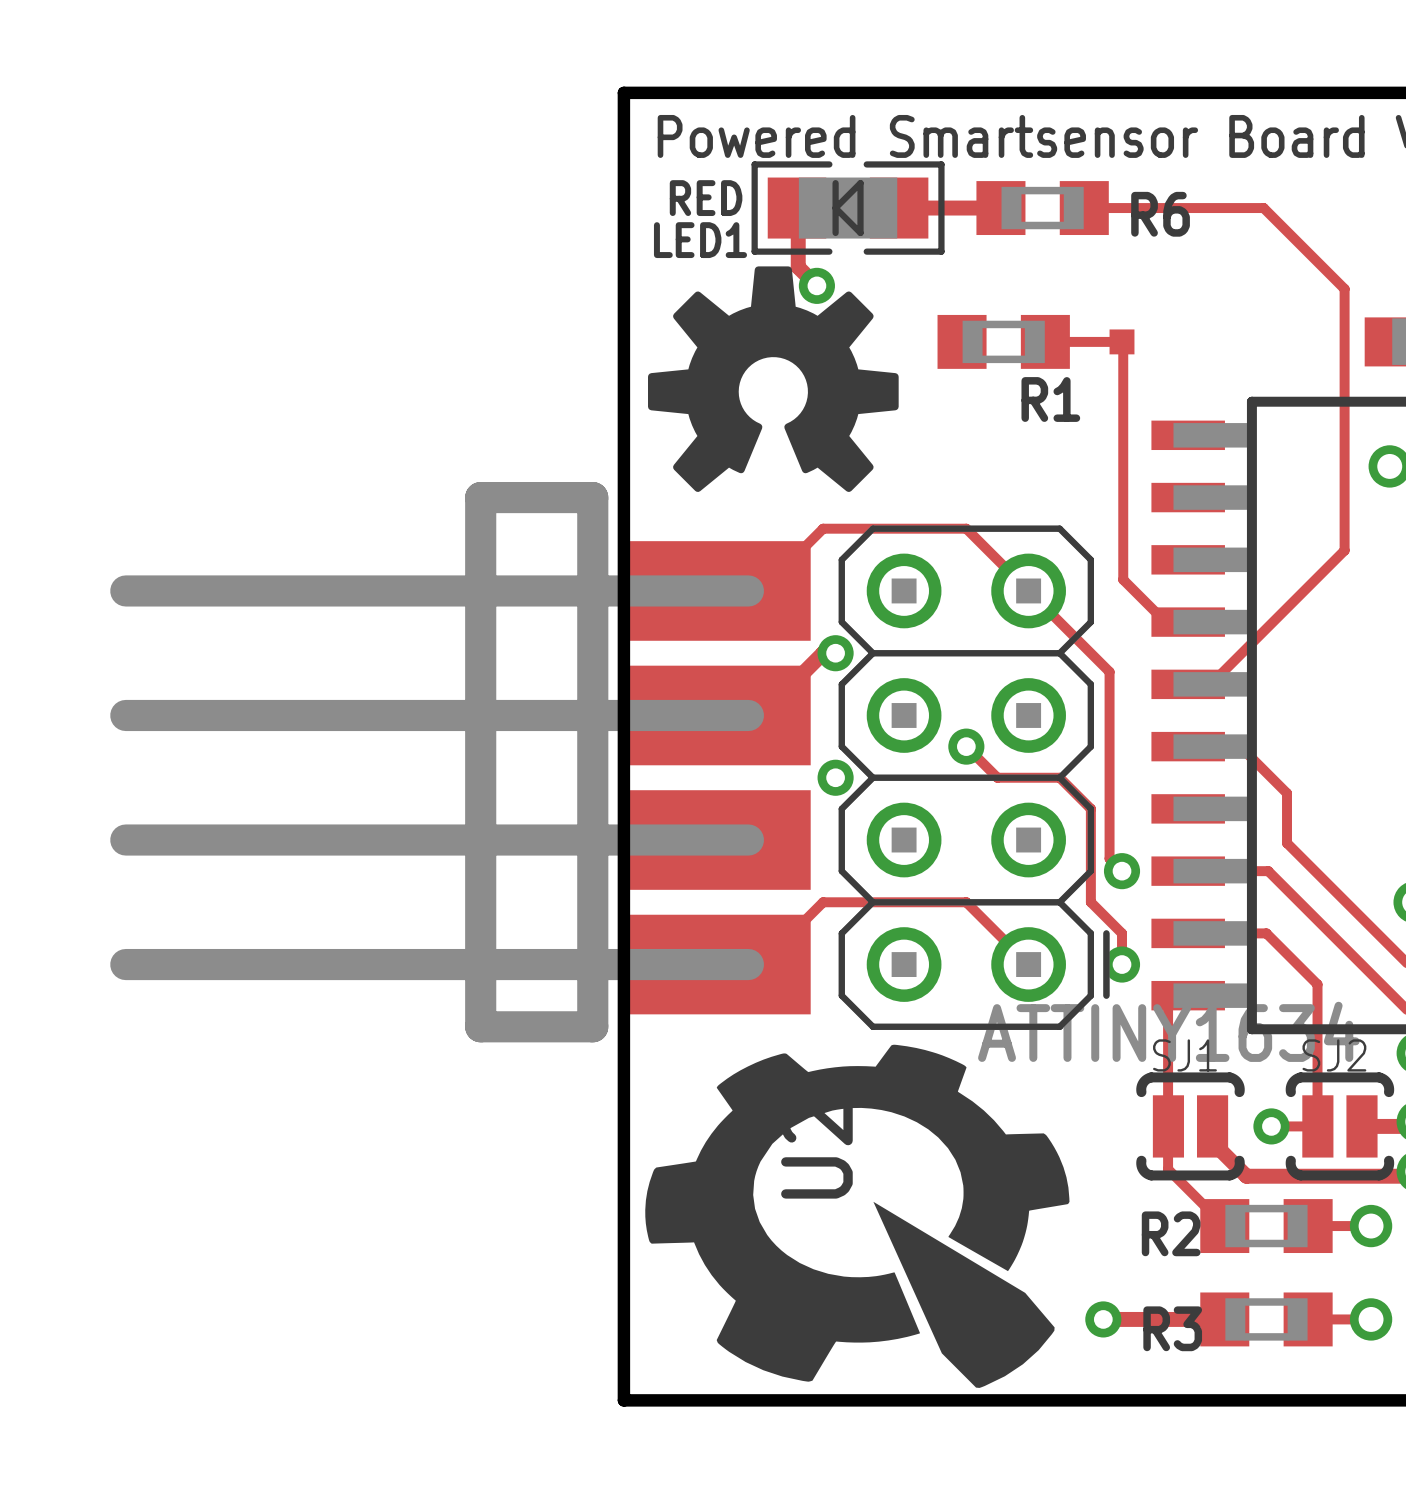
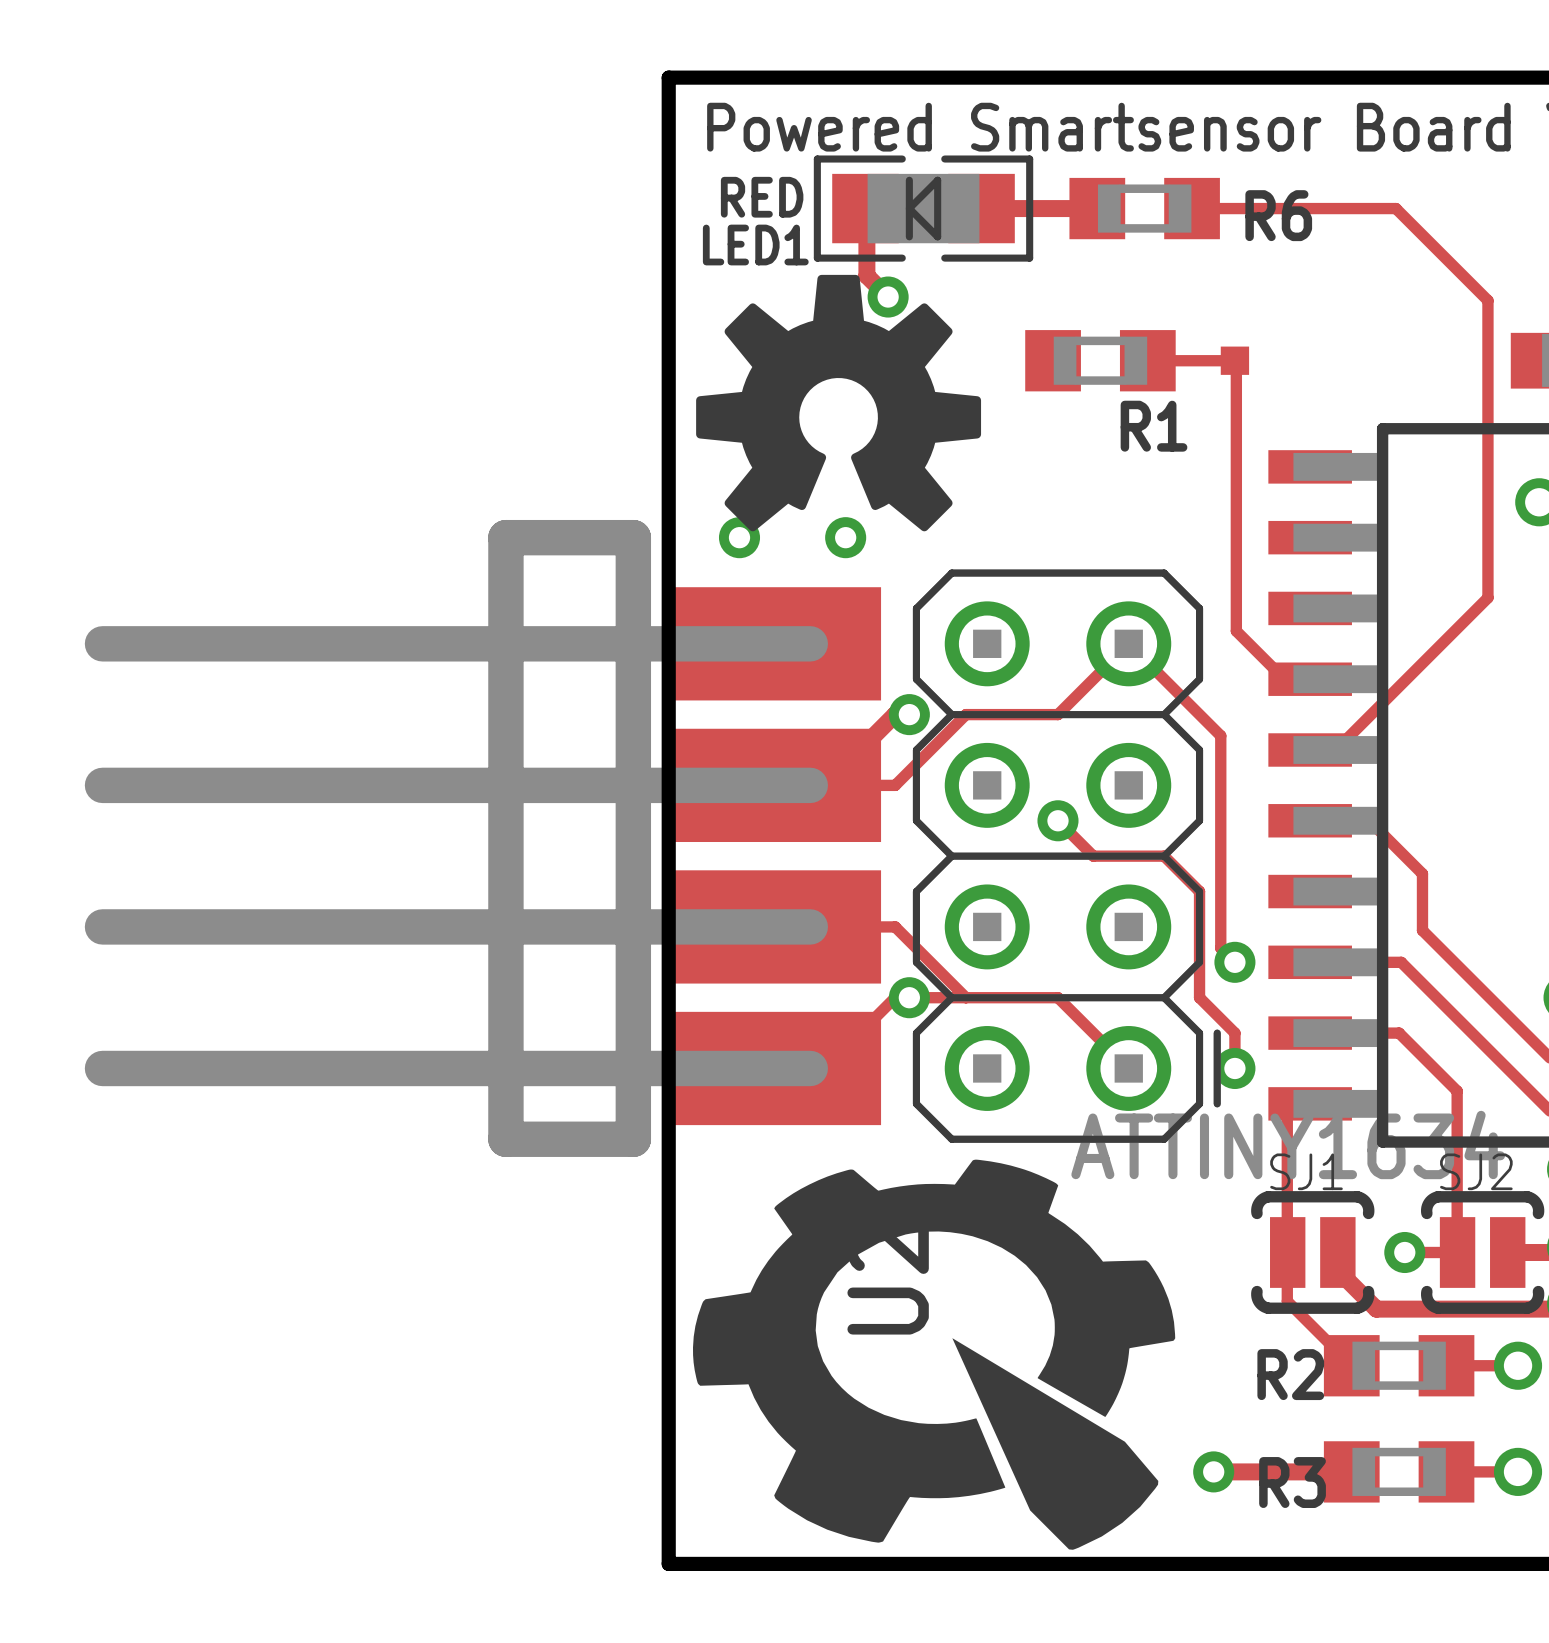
via: none -> (739, 537)
via: none -> (845, 537)
track: (717, 590) (742, 566) (785, 566) (823, 528) (966, 528) (1028, 590) -> (824, 785) (895, 785) (965, 714) (1057, 714) (1128, 643)
via position: (835, 777) -> (909, 997)
track: none -> (774, 926) (895, 926) (965, 997)

